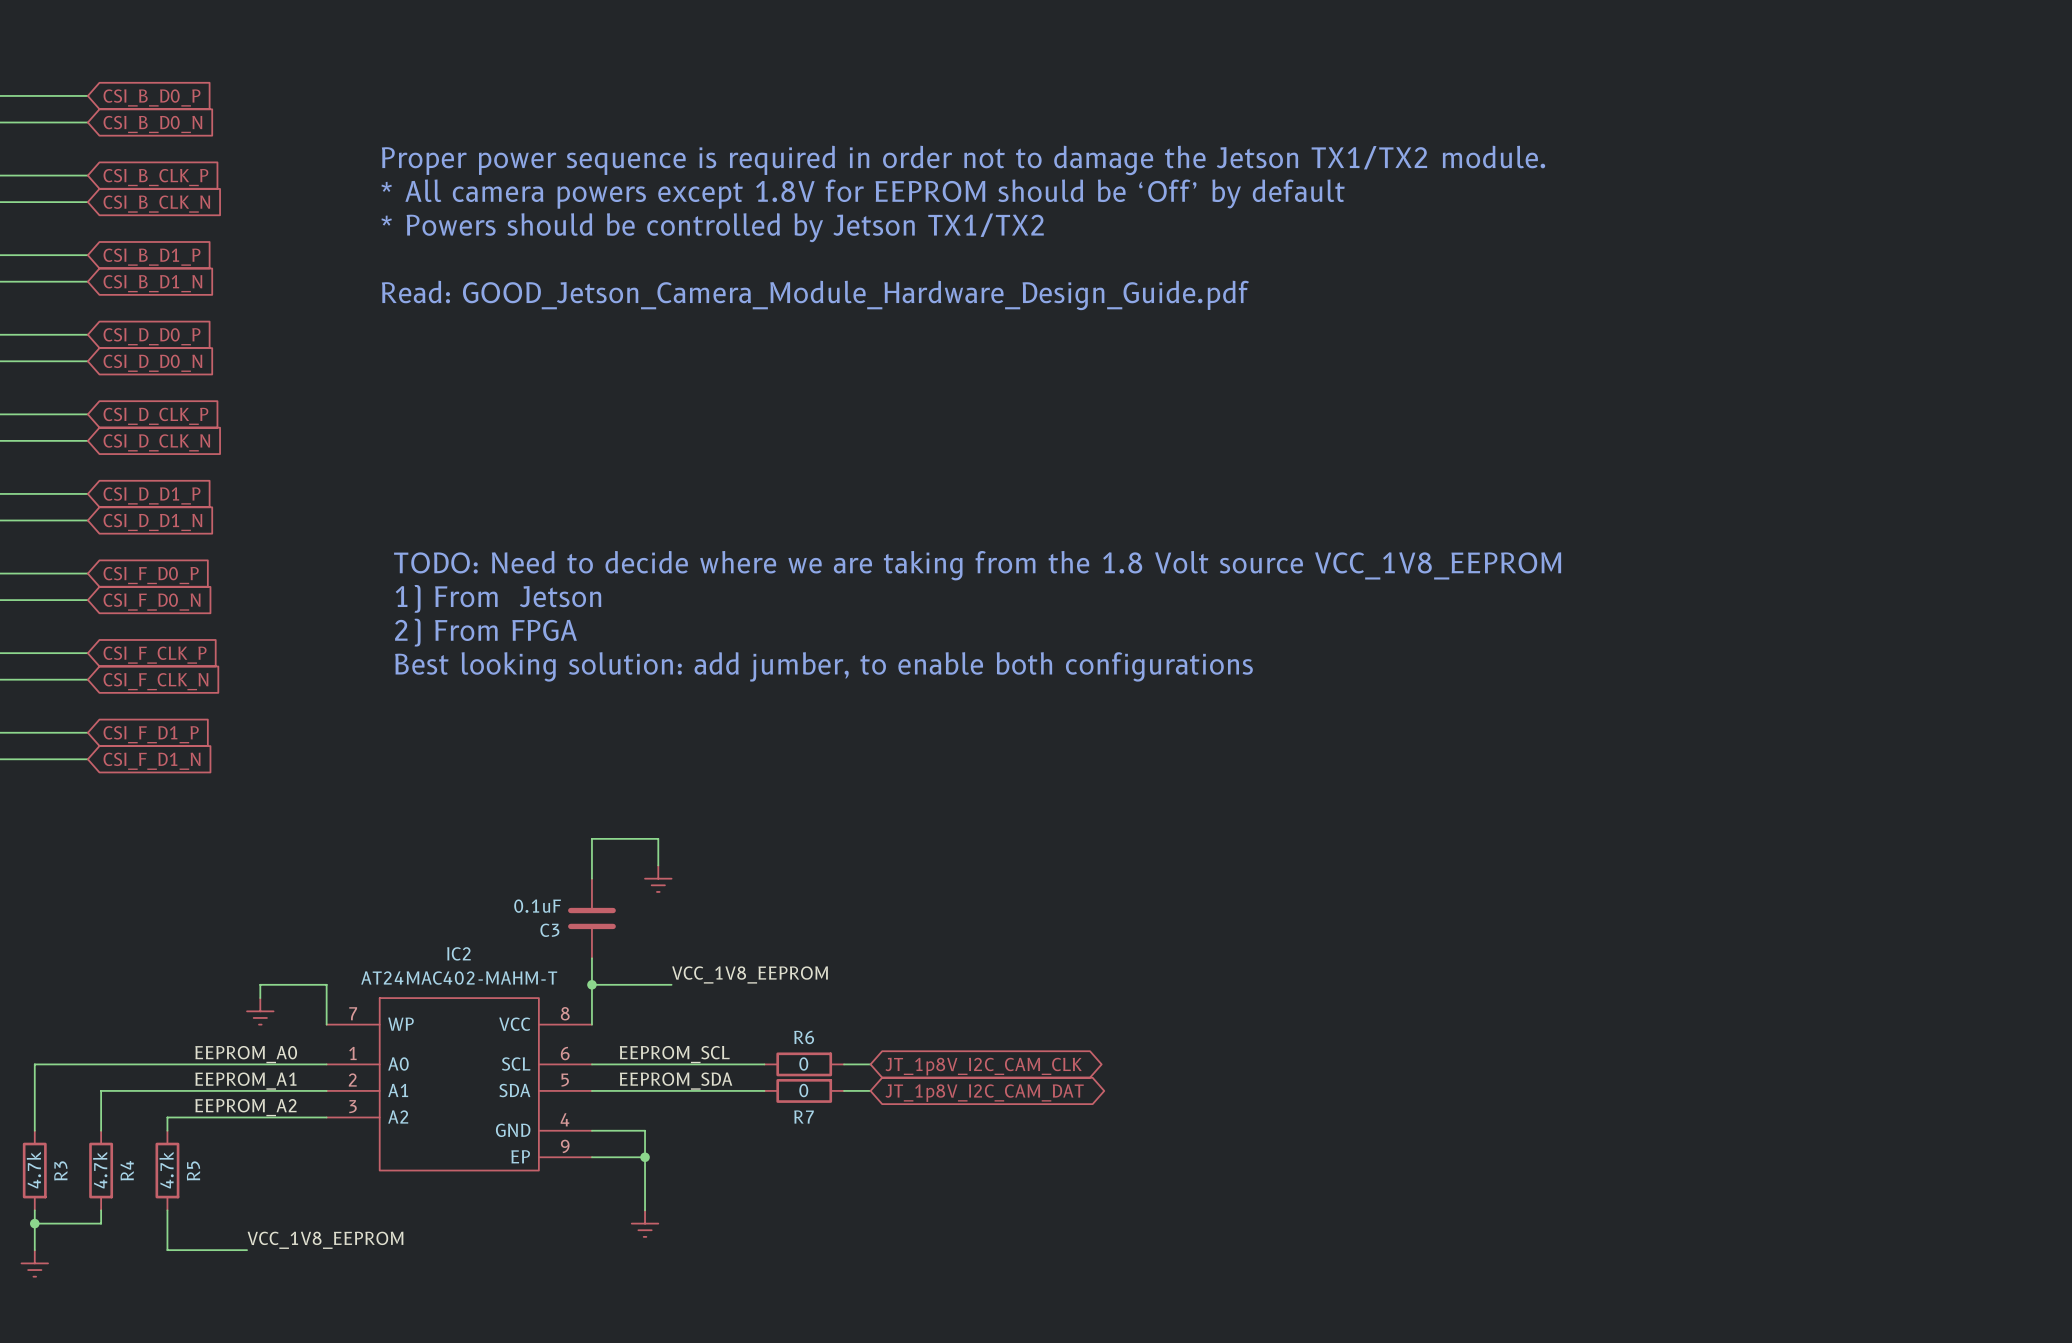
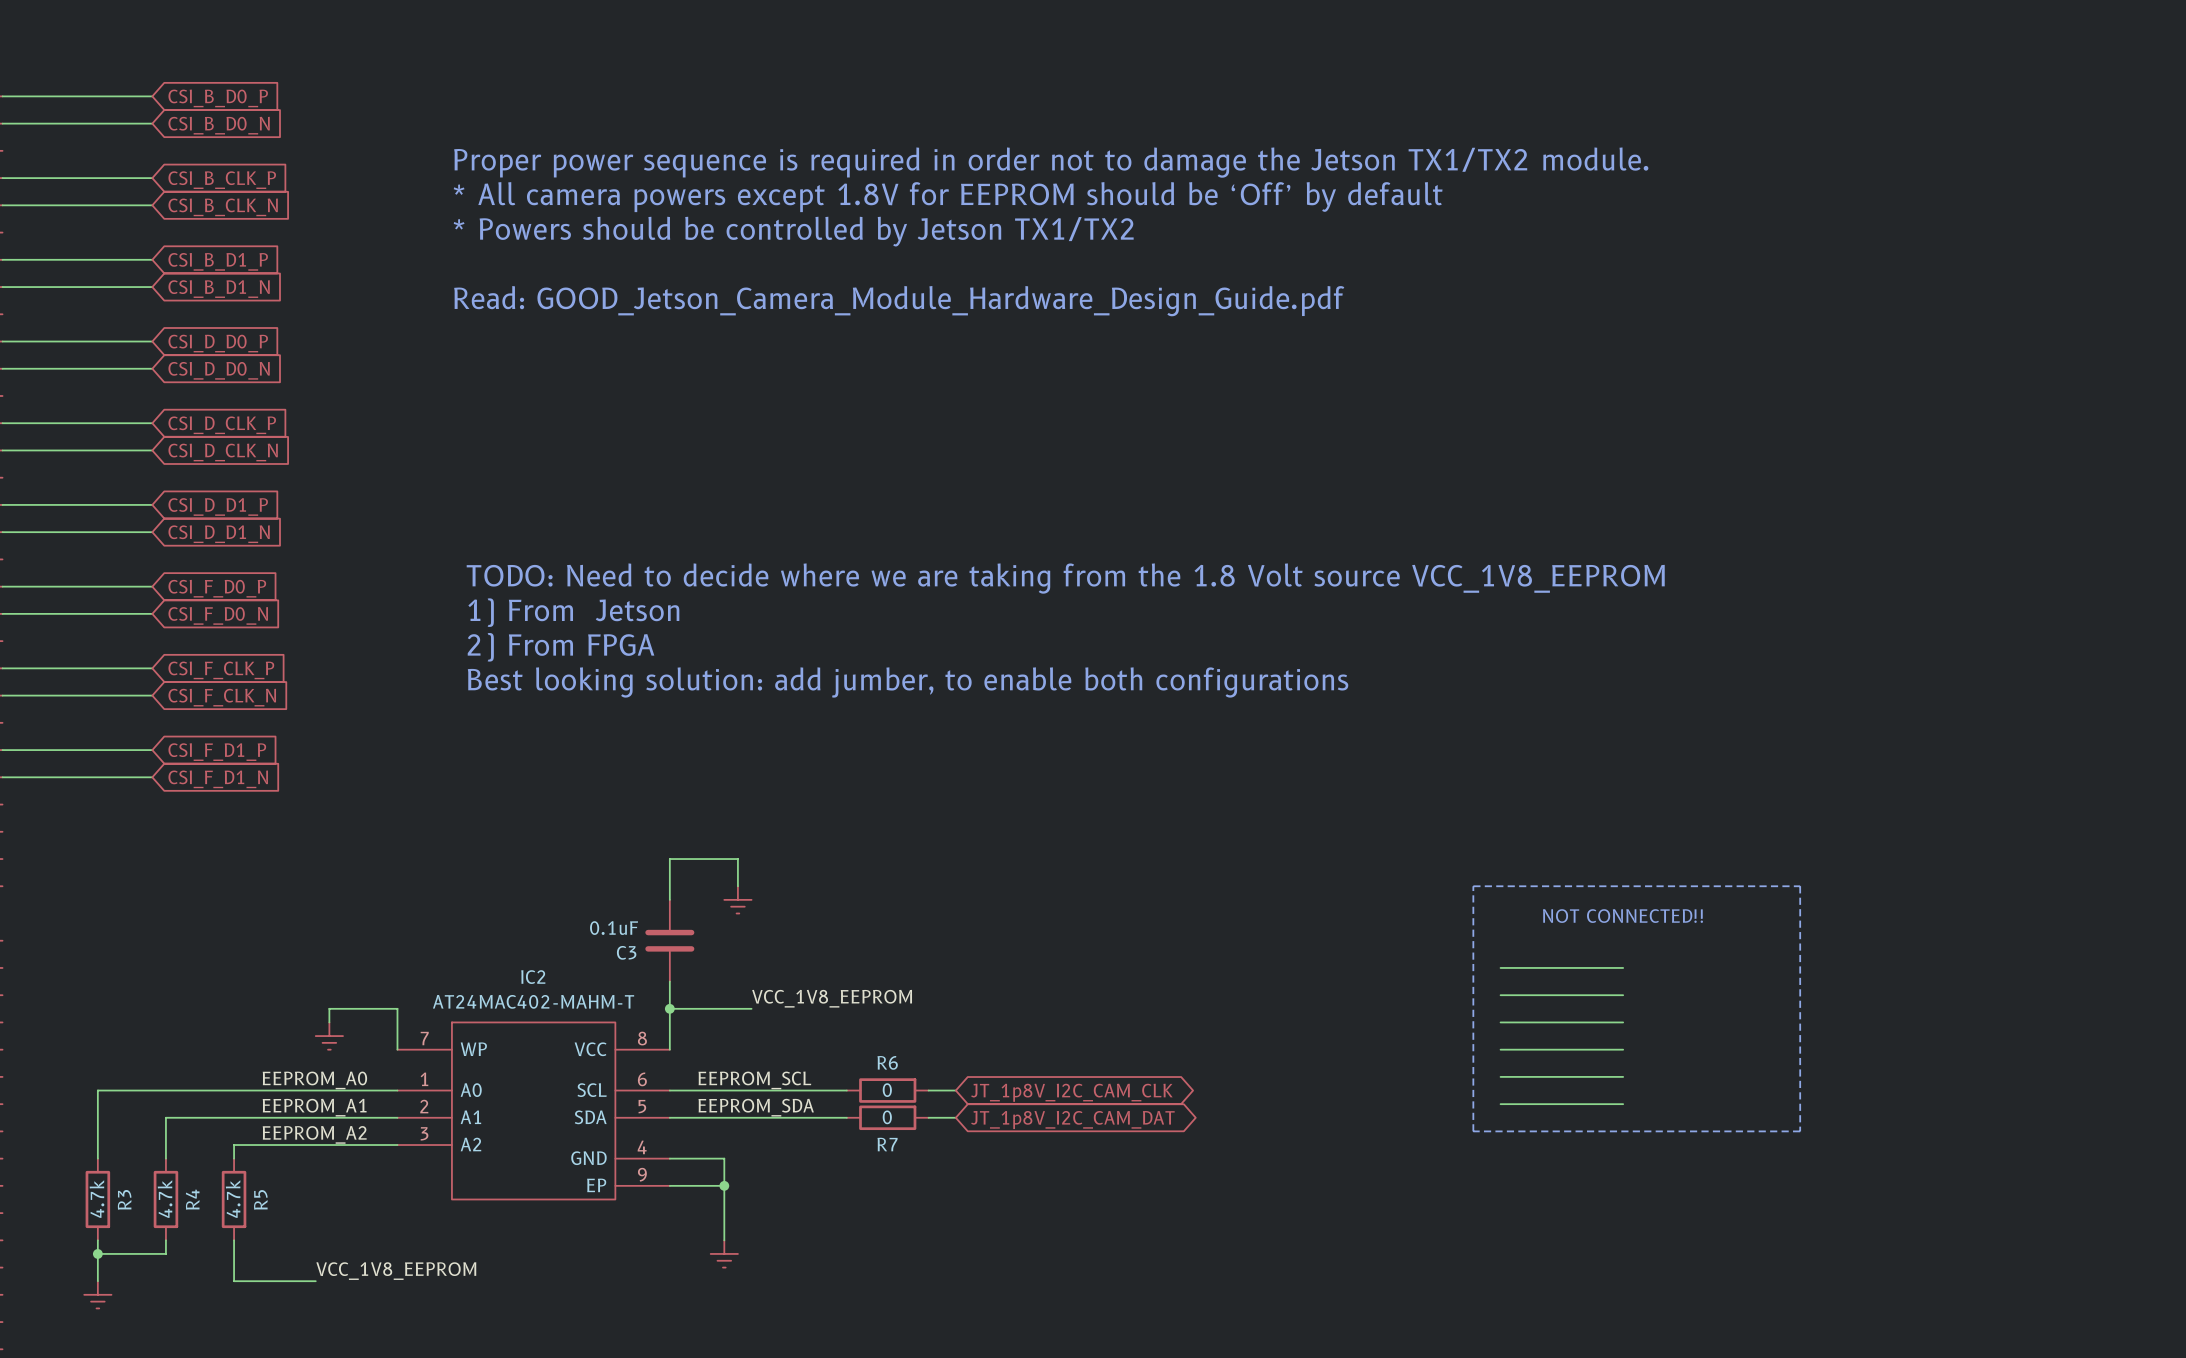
line: none -> (1473, 886) (1800, 886) (1800, 1131) (1473, 1131) (1473, 886)
text: none -> NOT CONNECTED!! (1622, 916)
wire: none -> (1500, 967) (1623, 967)
wire: none -> (1500, 995) (1623, 995)
wire: none -> (1500, 1022) (1623, 1022)
wire: none -> (1500, 1049) (1623, 1049)
wire: none -> (1500, 1076) (1623, 1076)
wire: none -> (1500, 1104) (1623, 1104)

